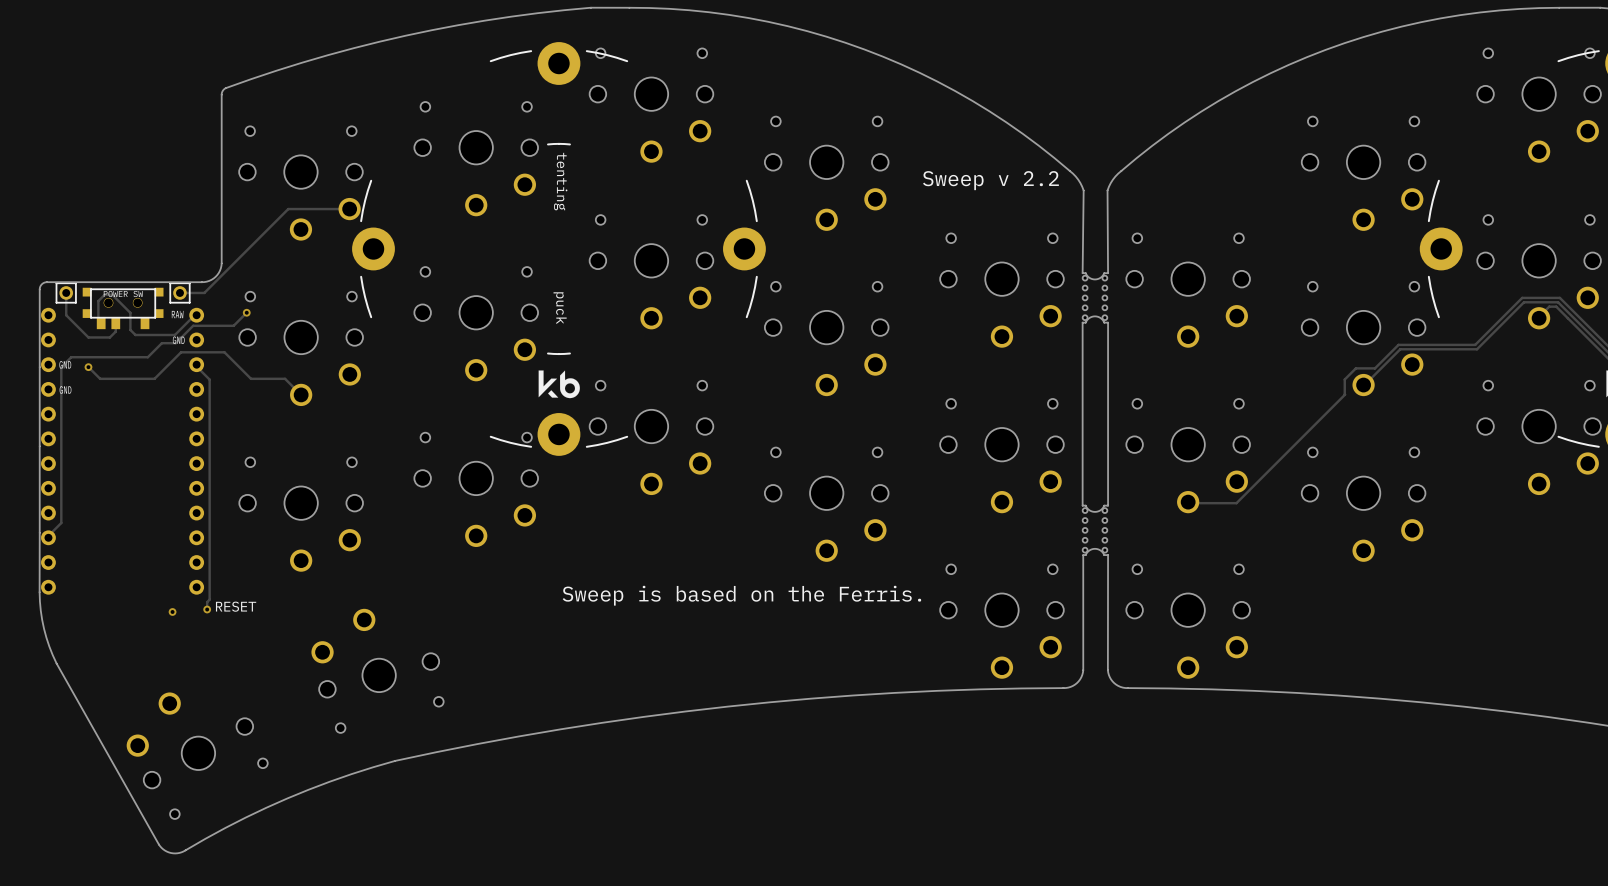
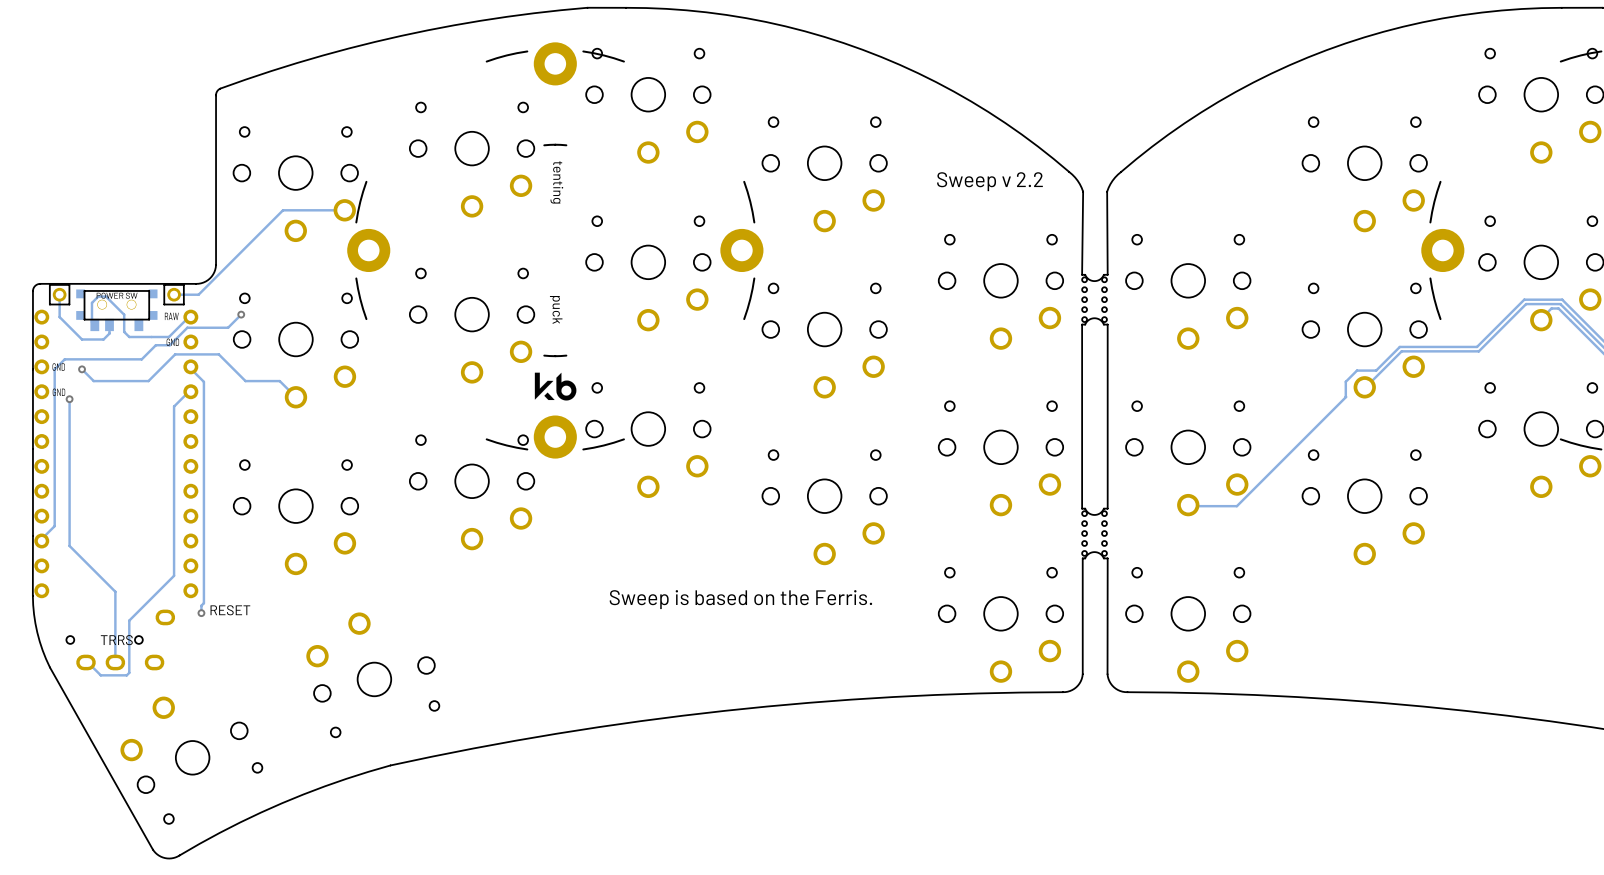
track: none -> (188, 391) (174, 406) (174, 575) (129, 620) (129, 672) (126, 675) (100, 675) (86, 660)
track: none -> (69, 399) (69, 545) (115, 591) (115, 660)
via: none -> (69, 399)
via: (172, 611) -> none
part: none -> (120, 639)

